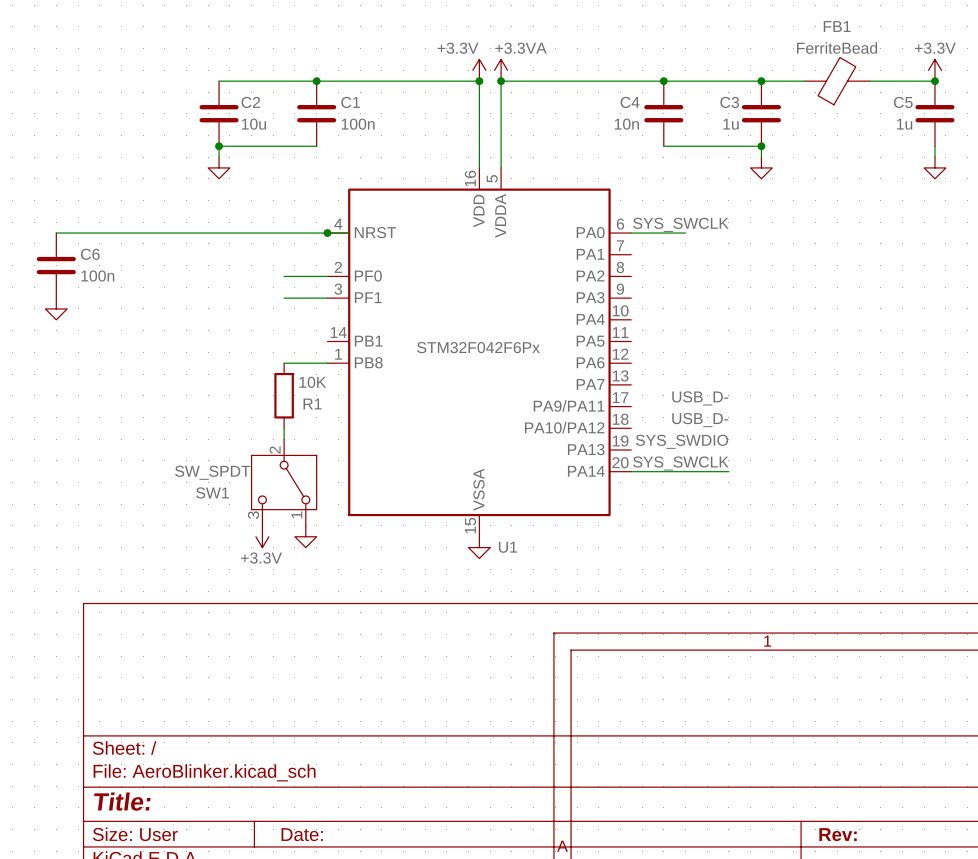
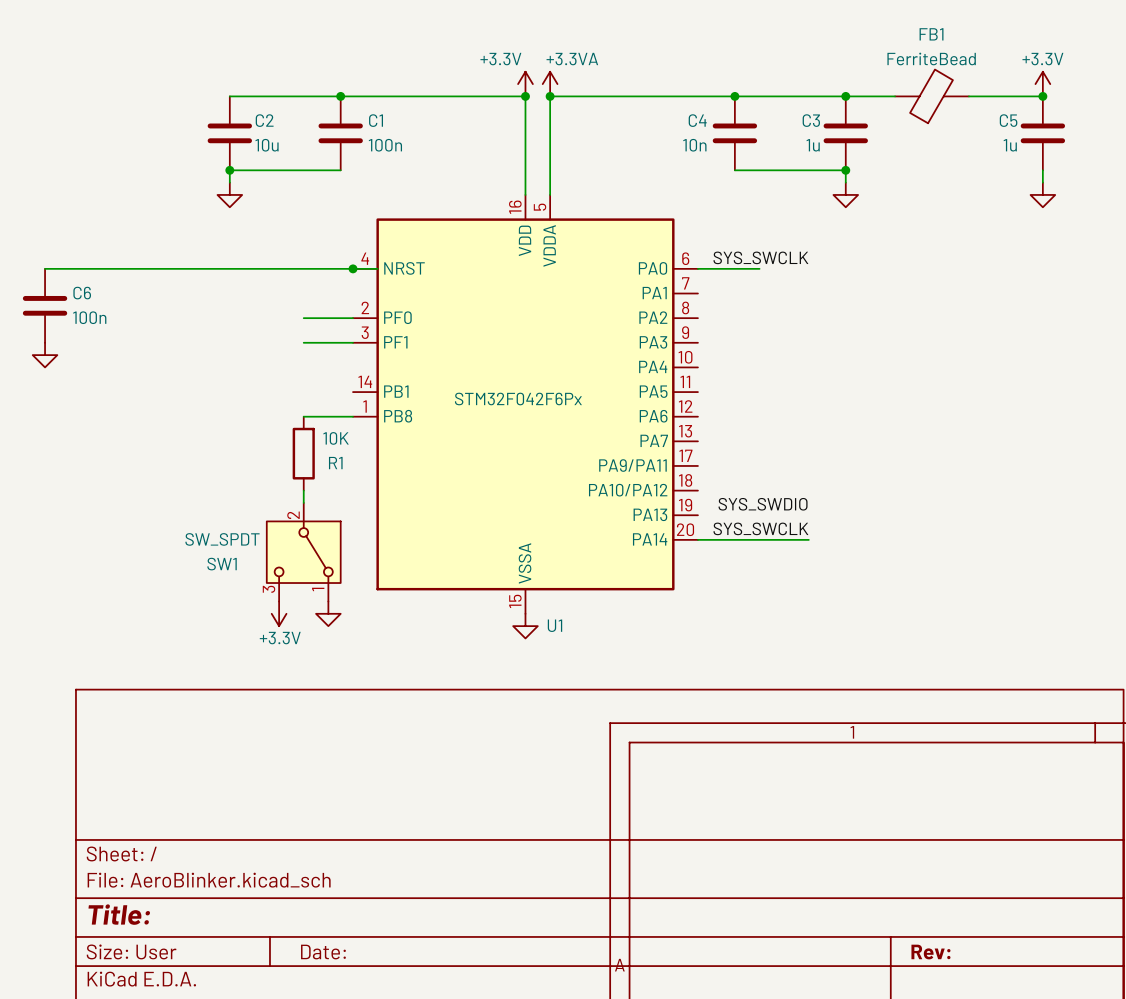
label: USB_D- (700, 398) -> none
label: USB_D- (700, 420) -> none

